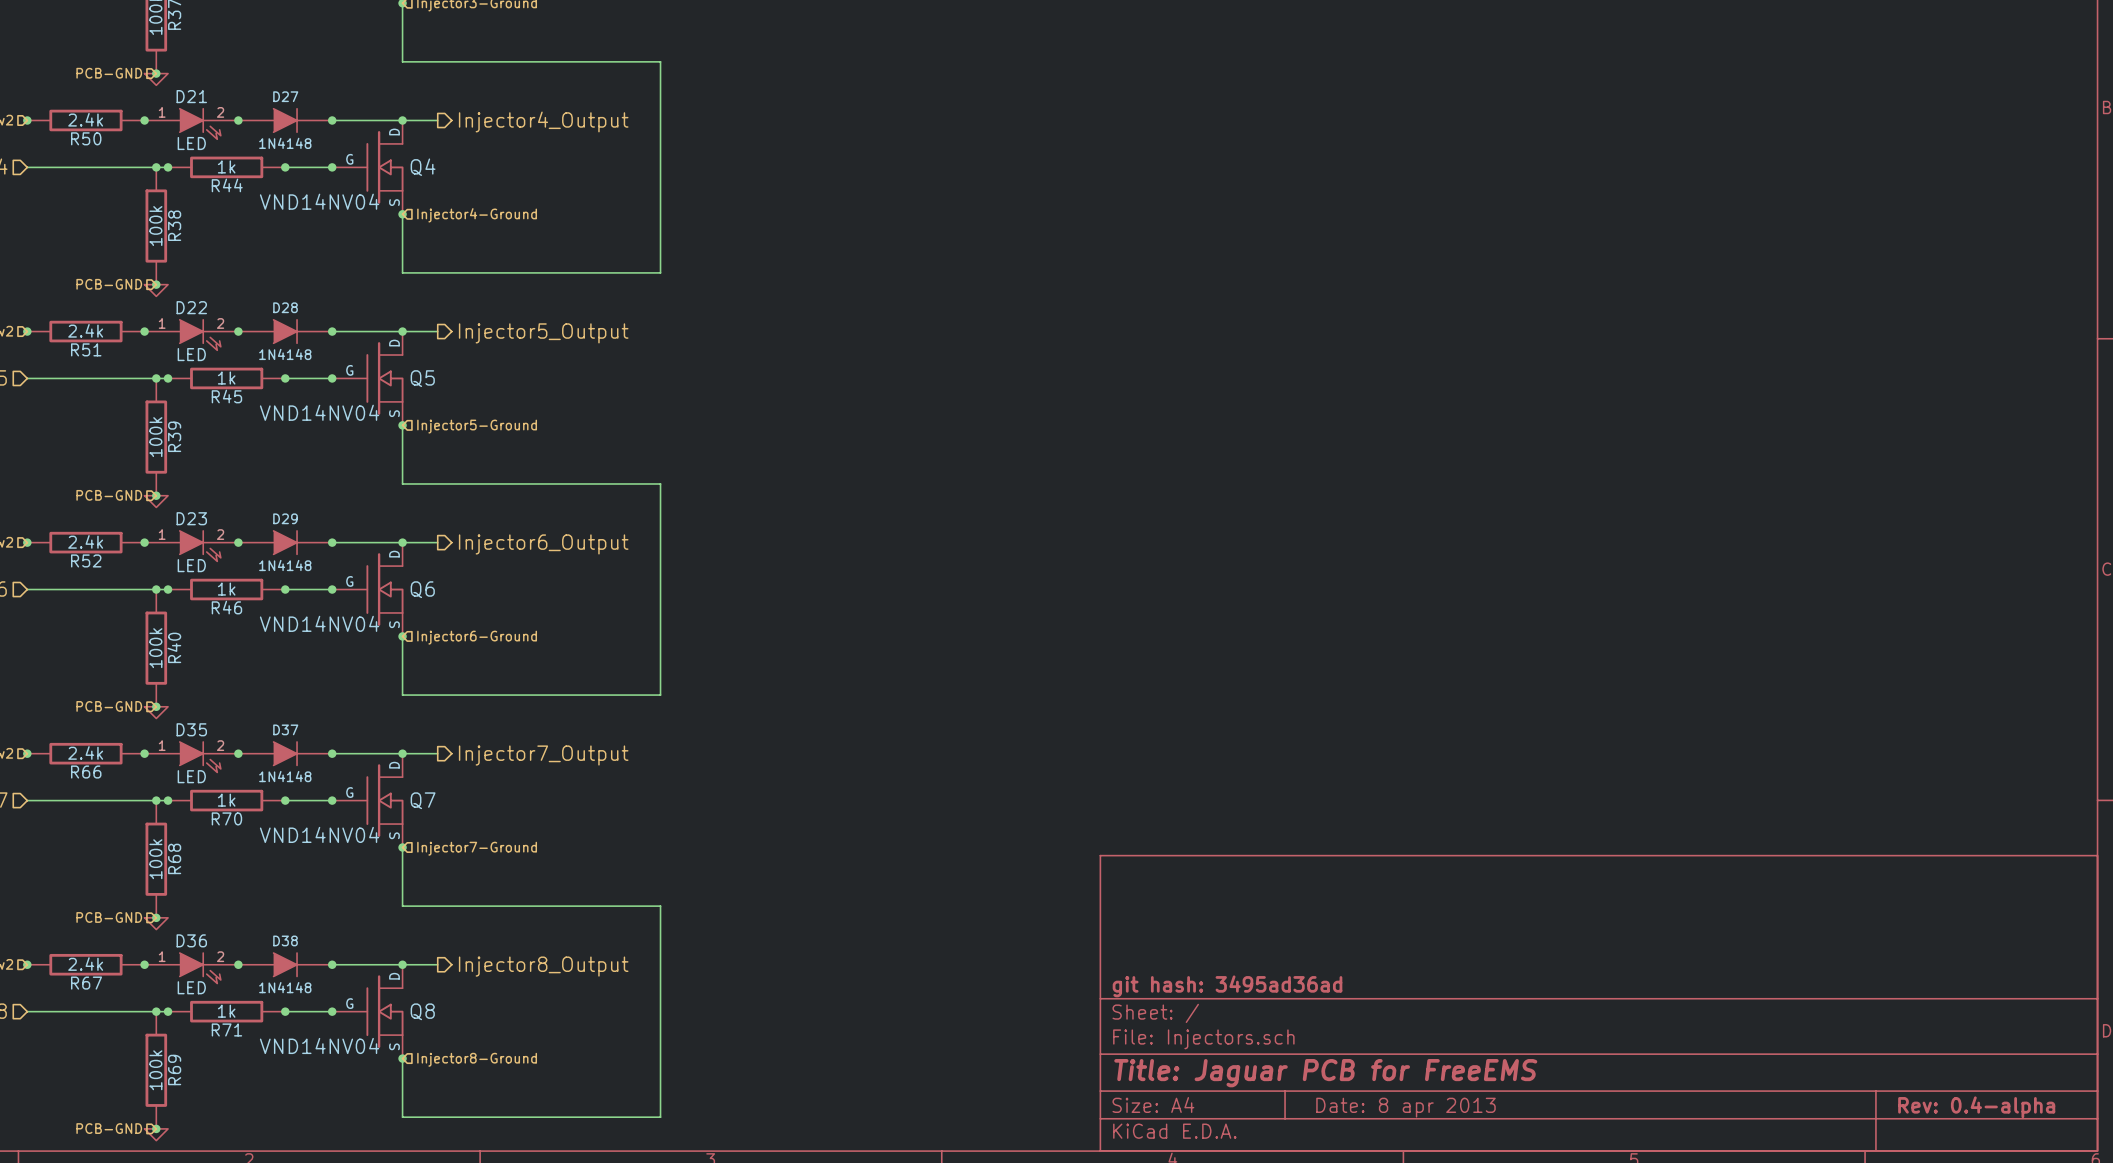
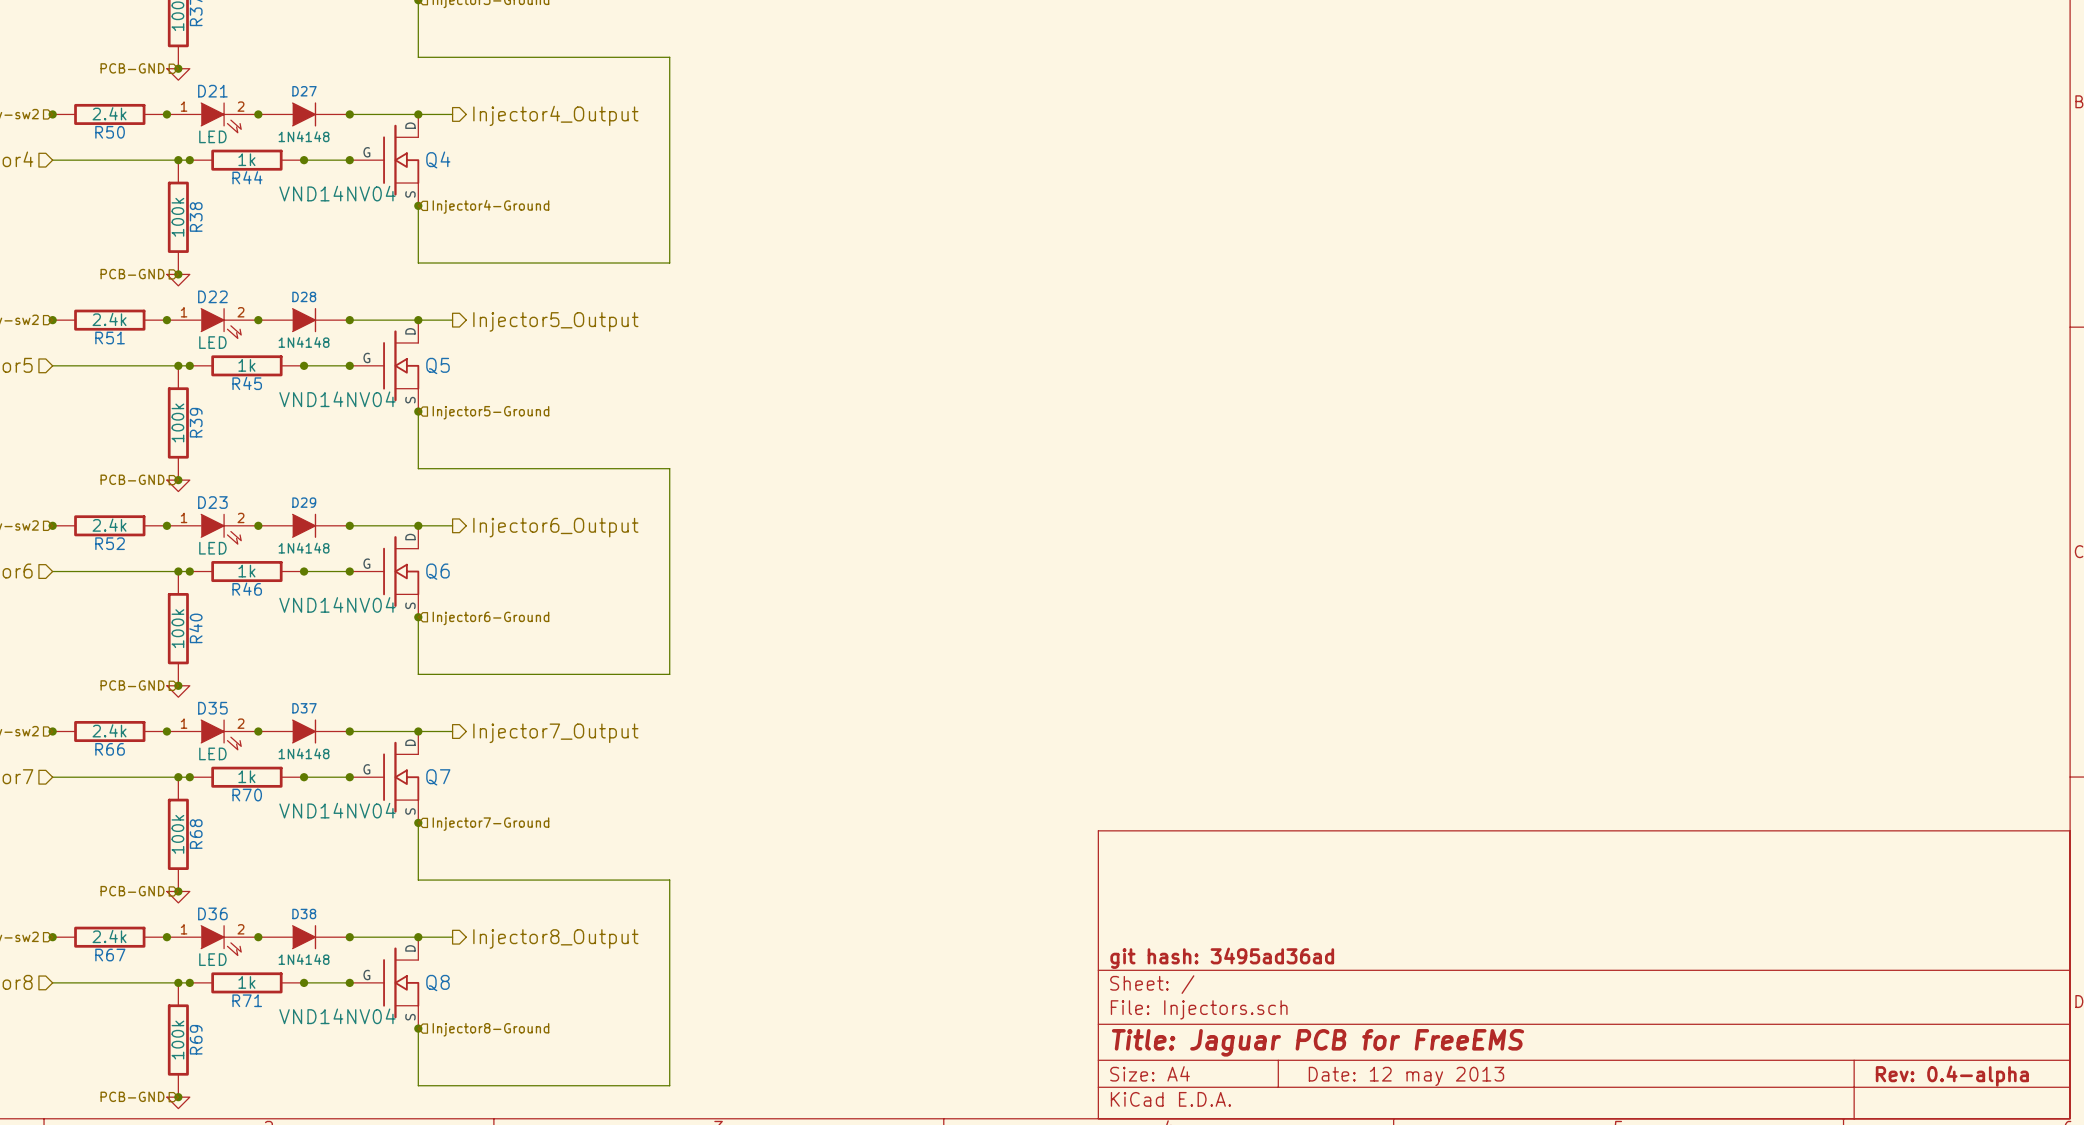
title block: Date: 8 apr 2013 (1405, 1107) -> Date: 12 may 2013 (1406, 1076)

